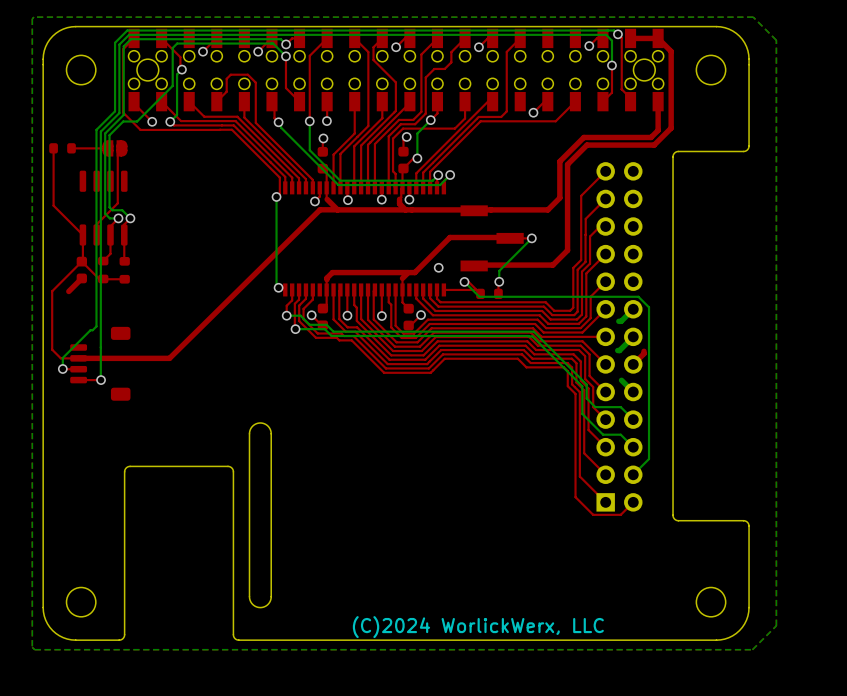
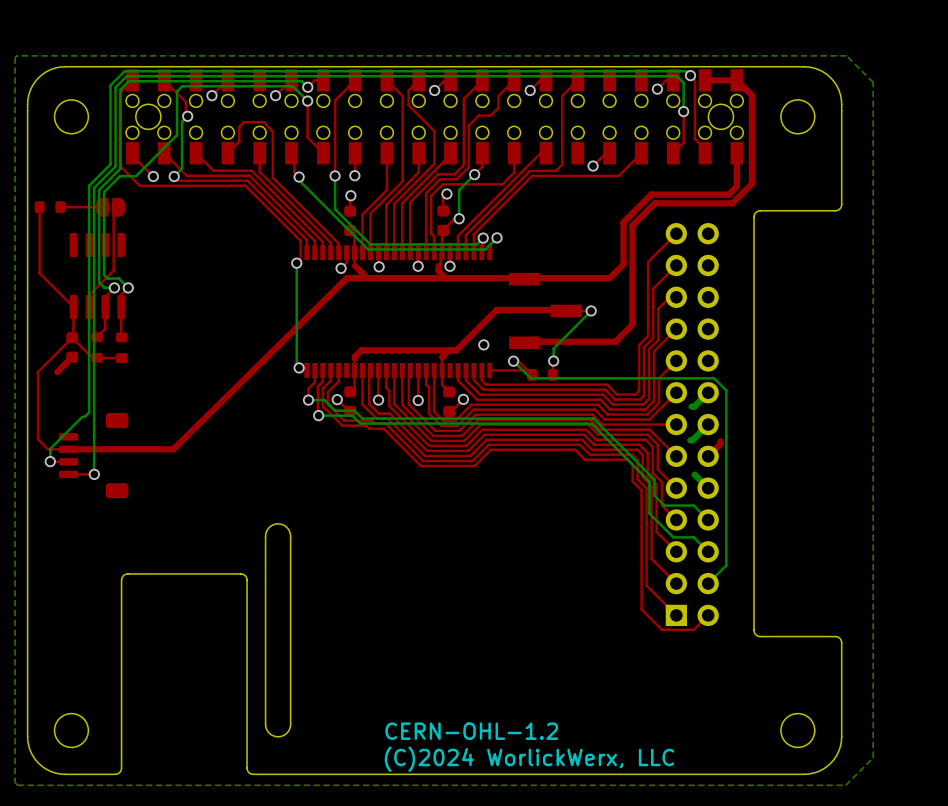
text: none -> CERN-OHL-1.2 (471, 731)

